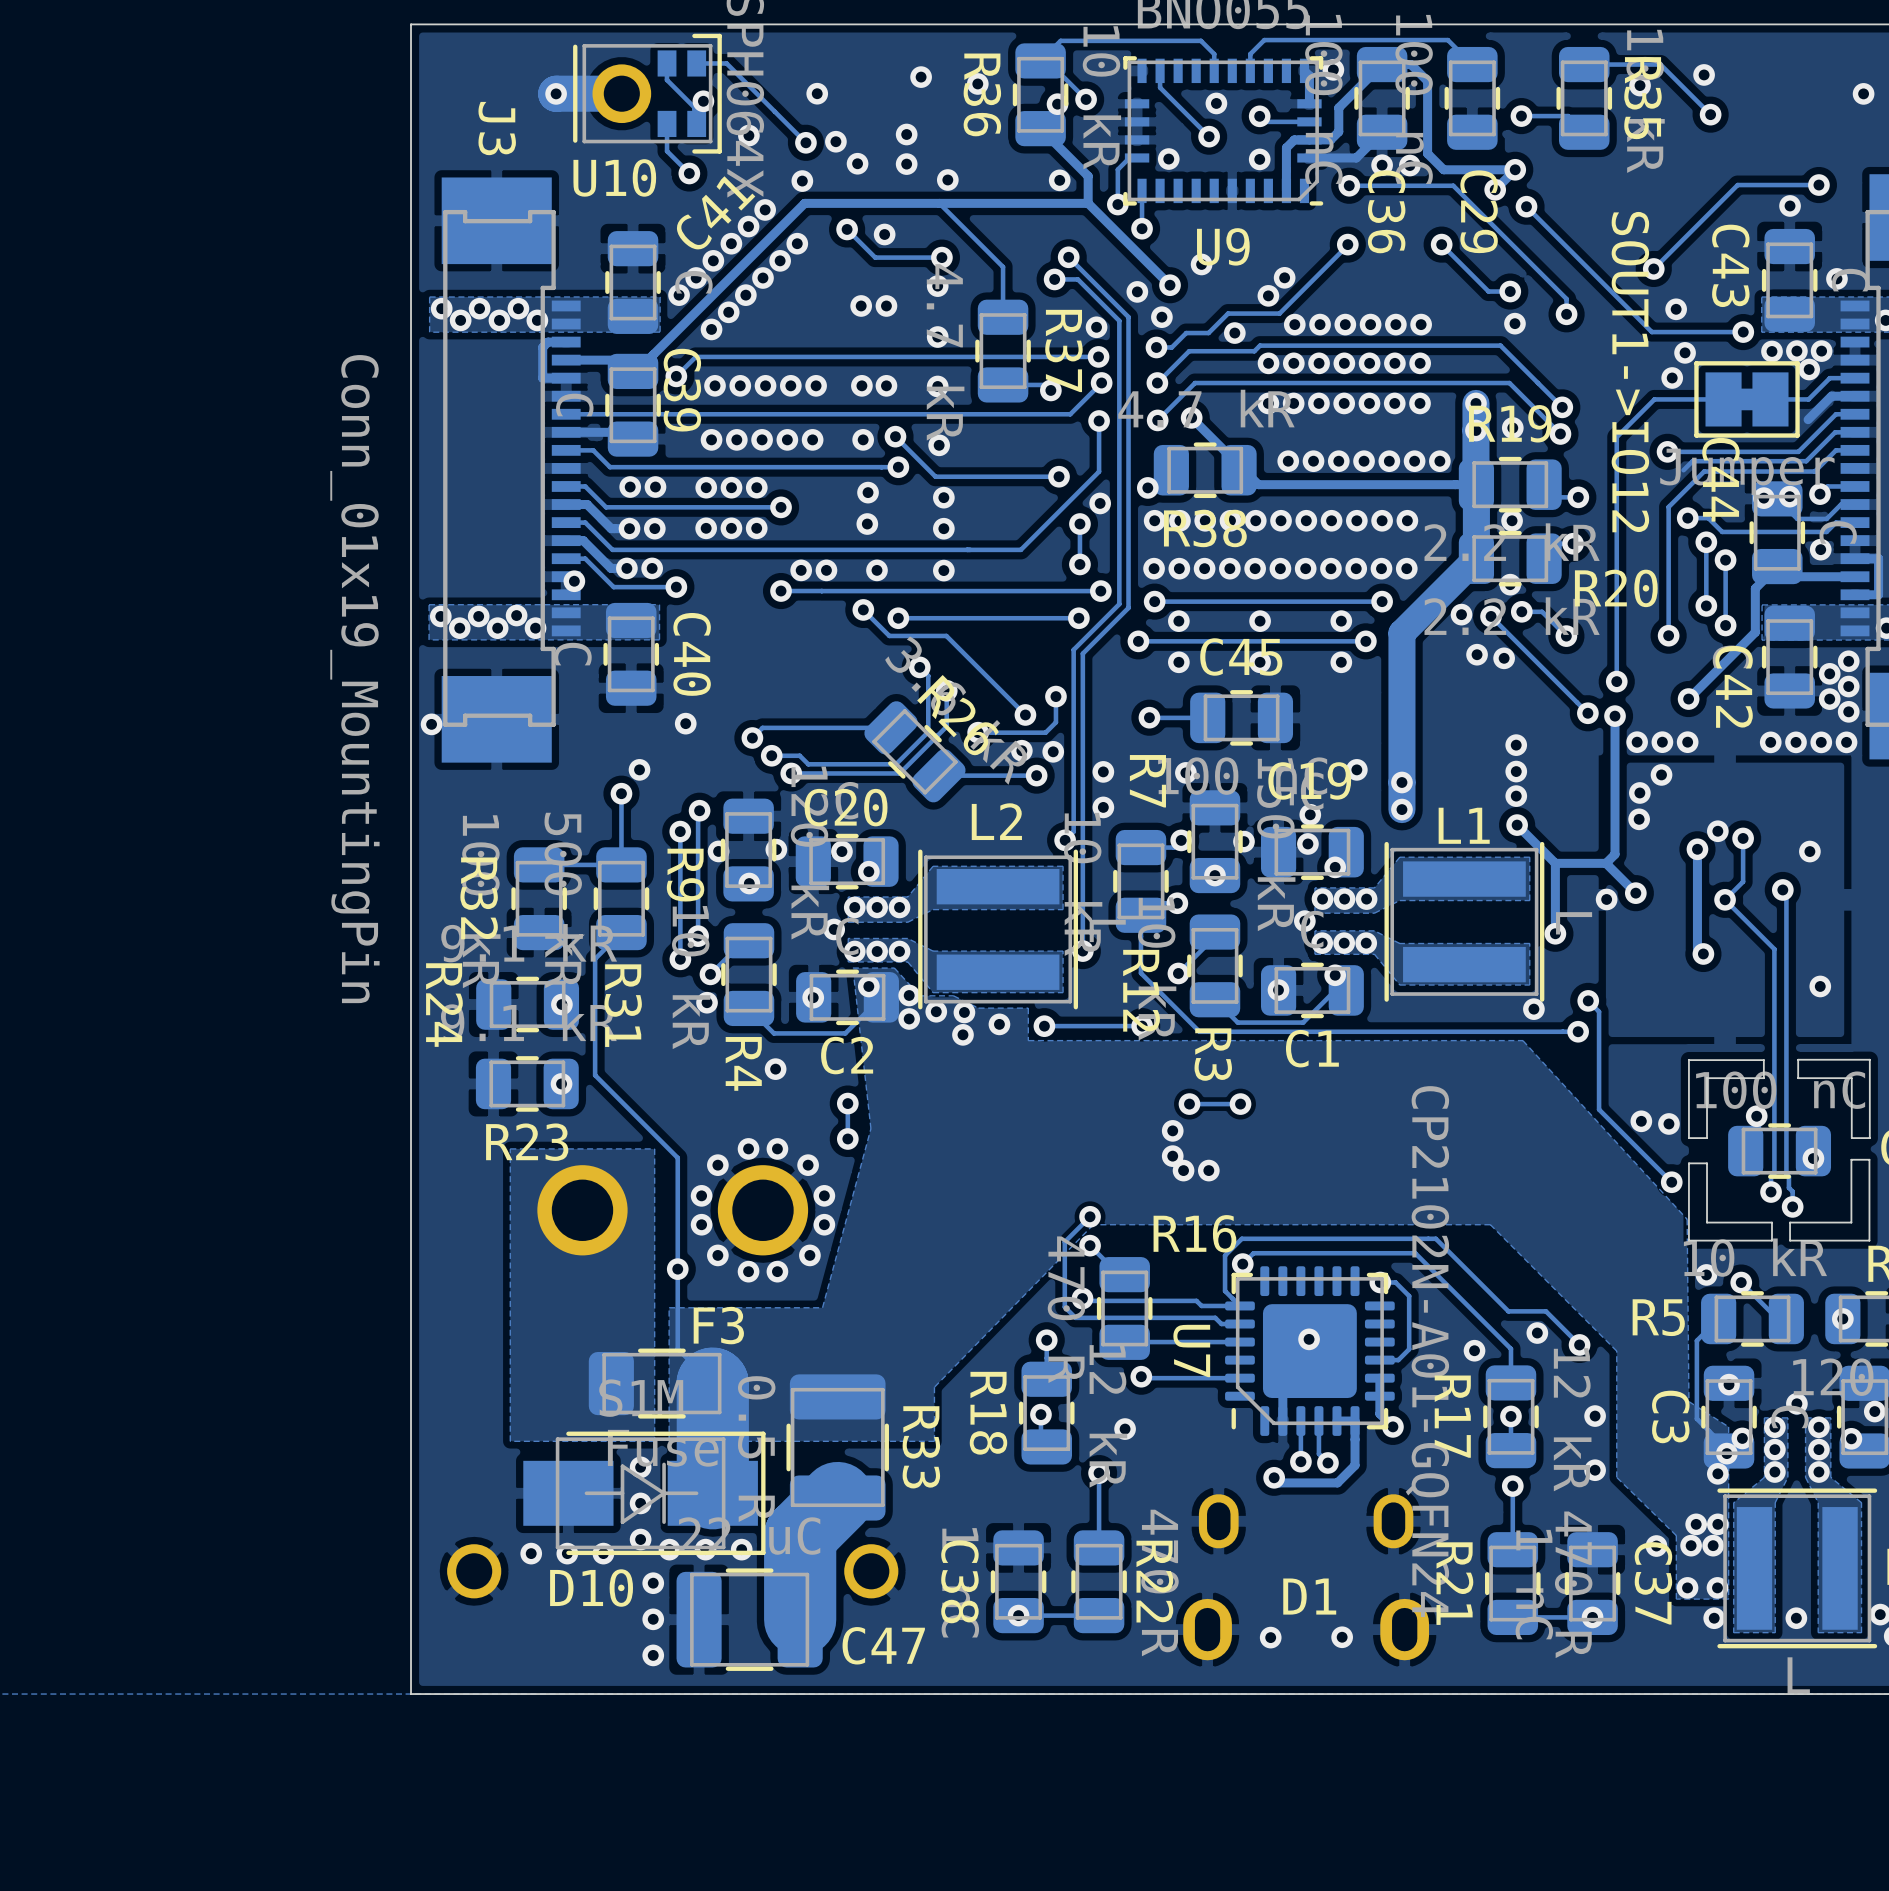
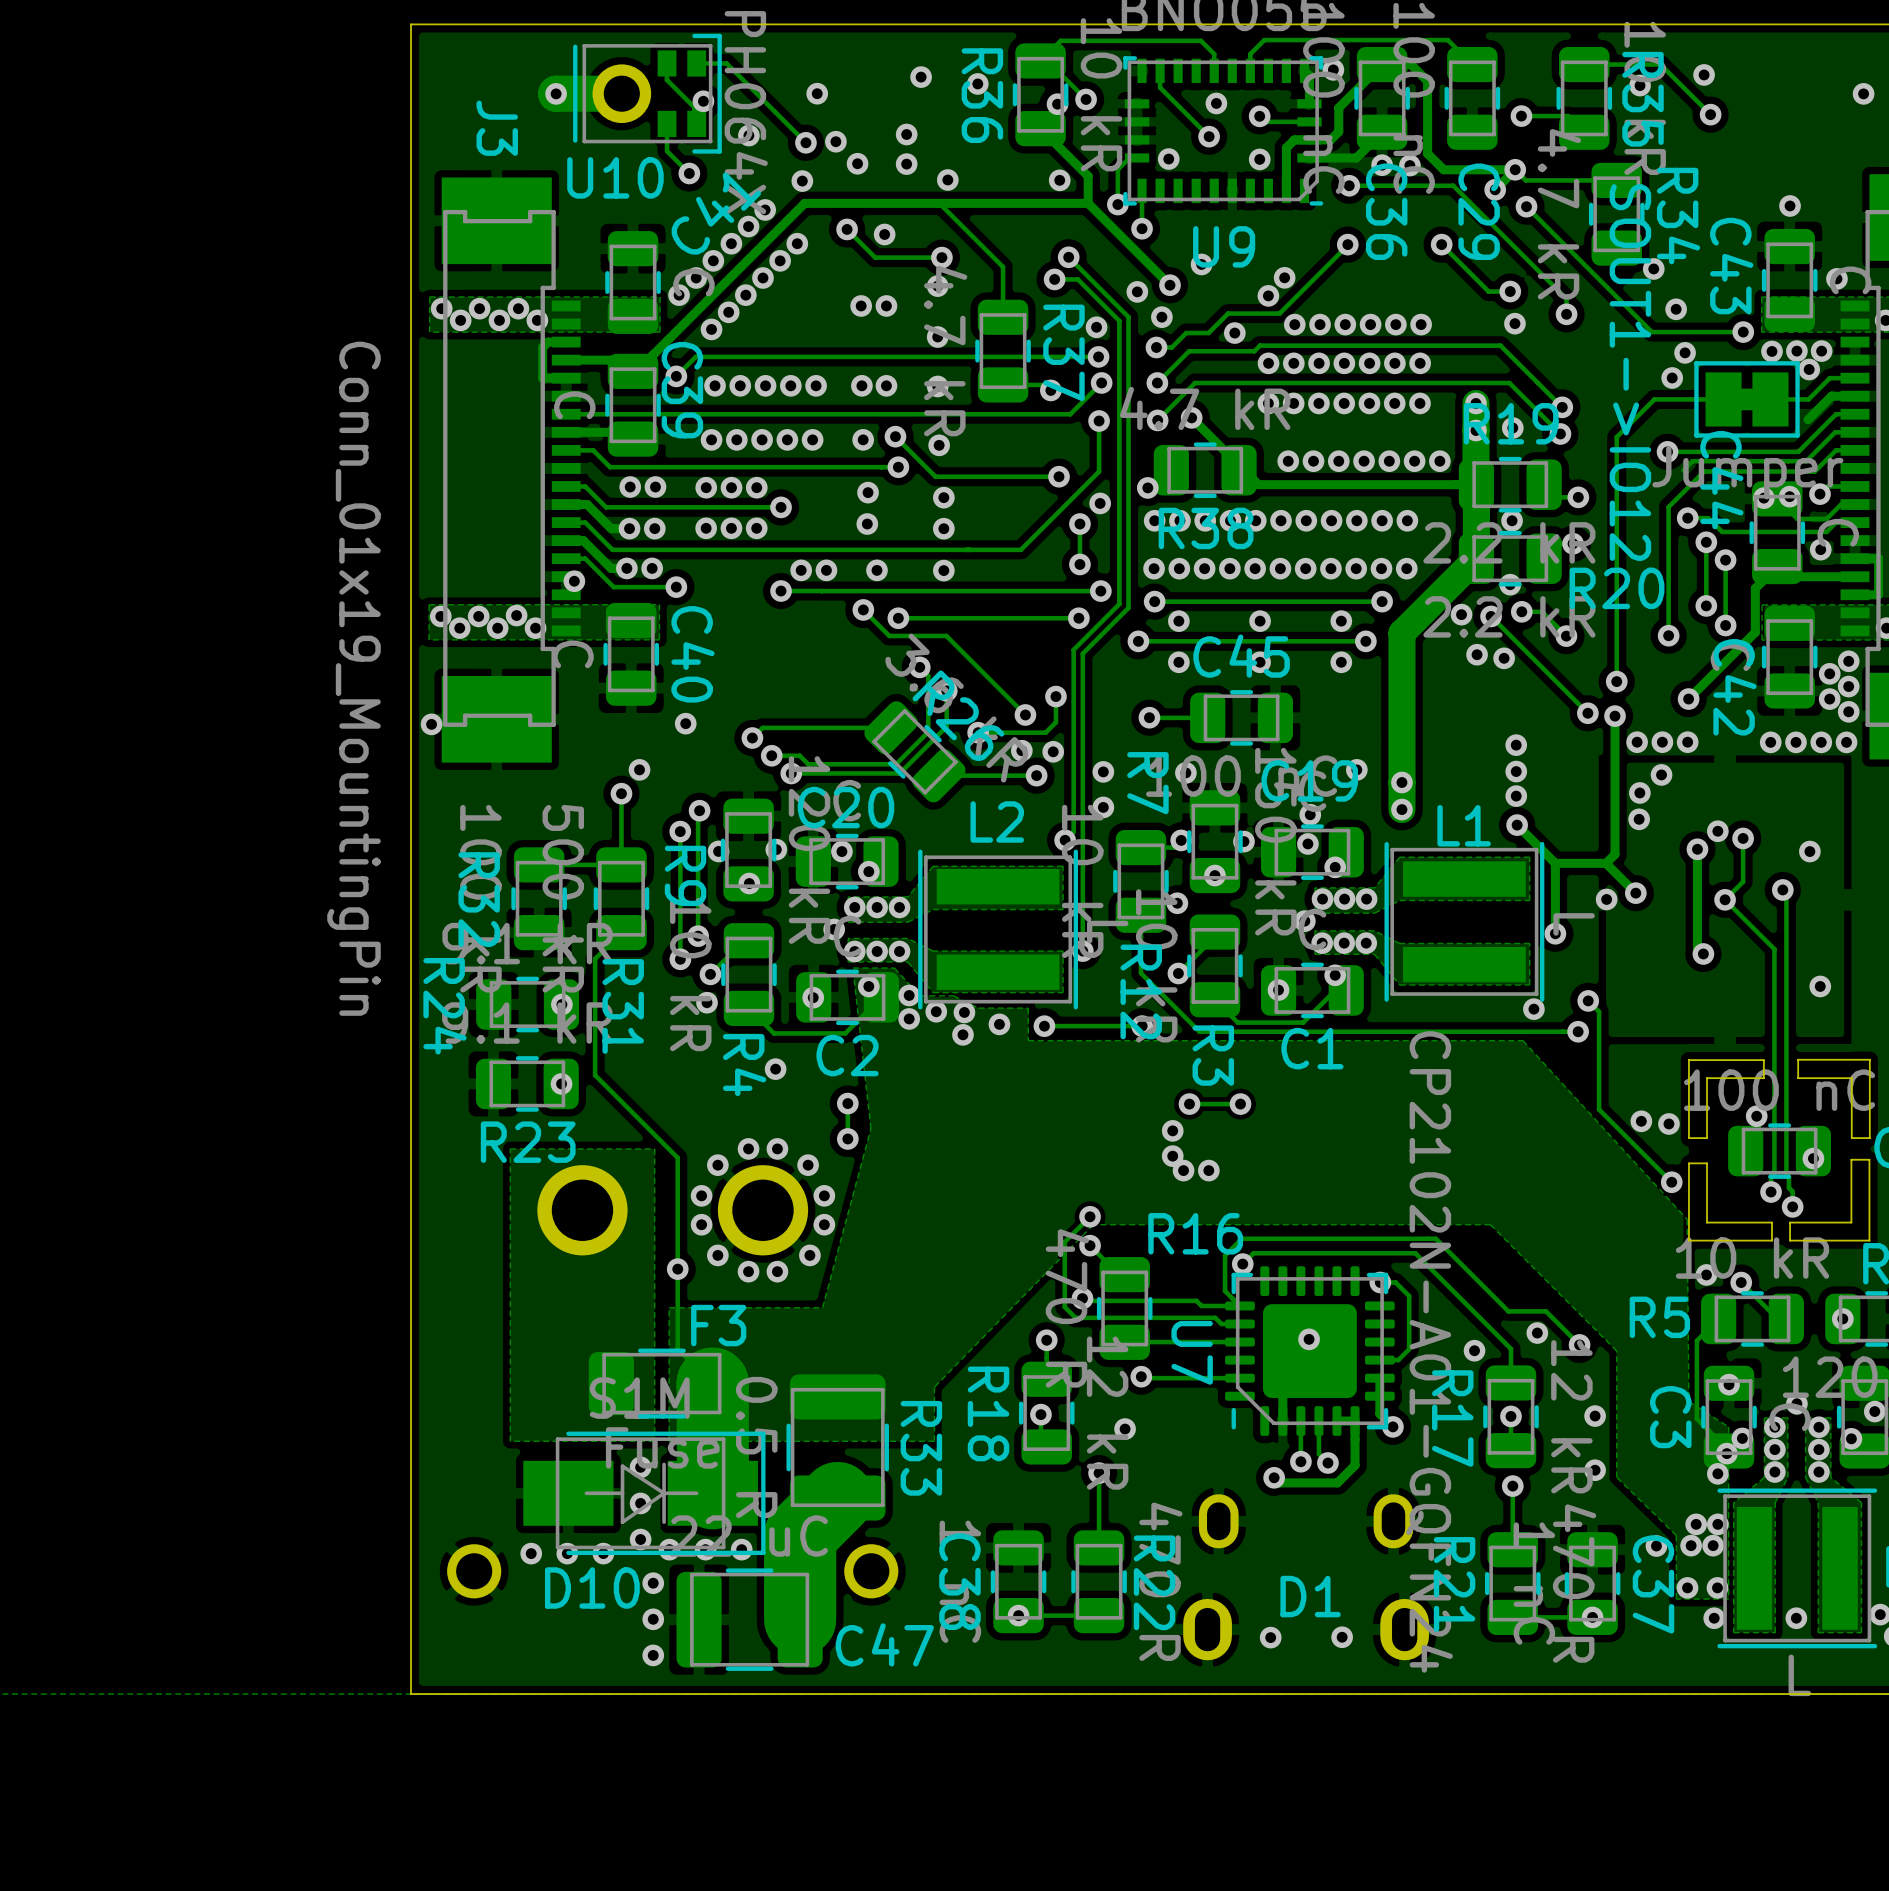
track: none -> (1515, 169) (1525, 180) (1616, 180)
track: (1818, 185) (1737, 185) (1653, 268) -> none
via: (1818, 185) -> none
R34: none -> 4.7 kR (1616, 214)

